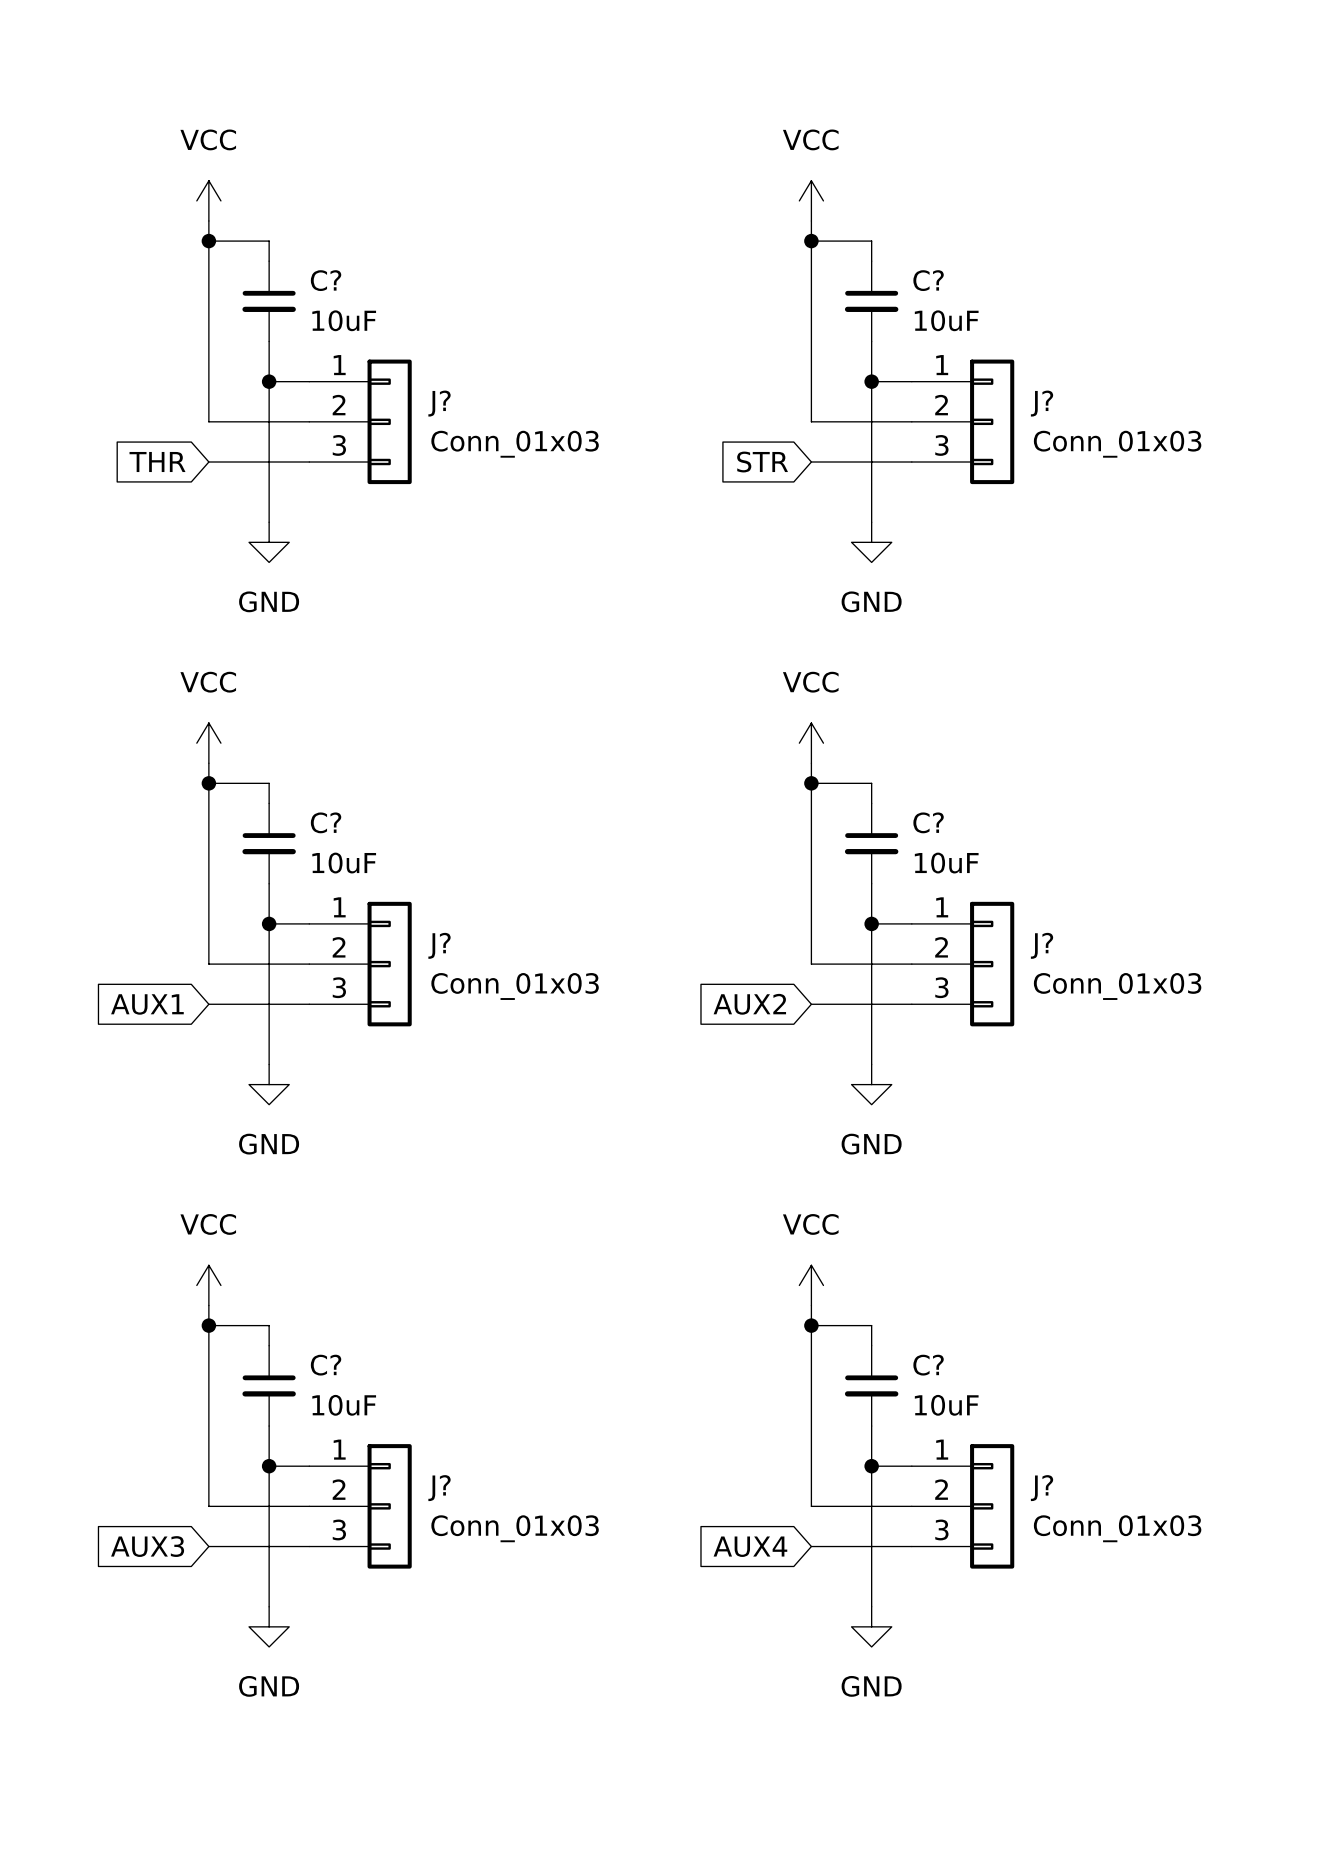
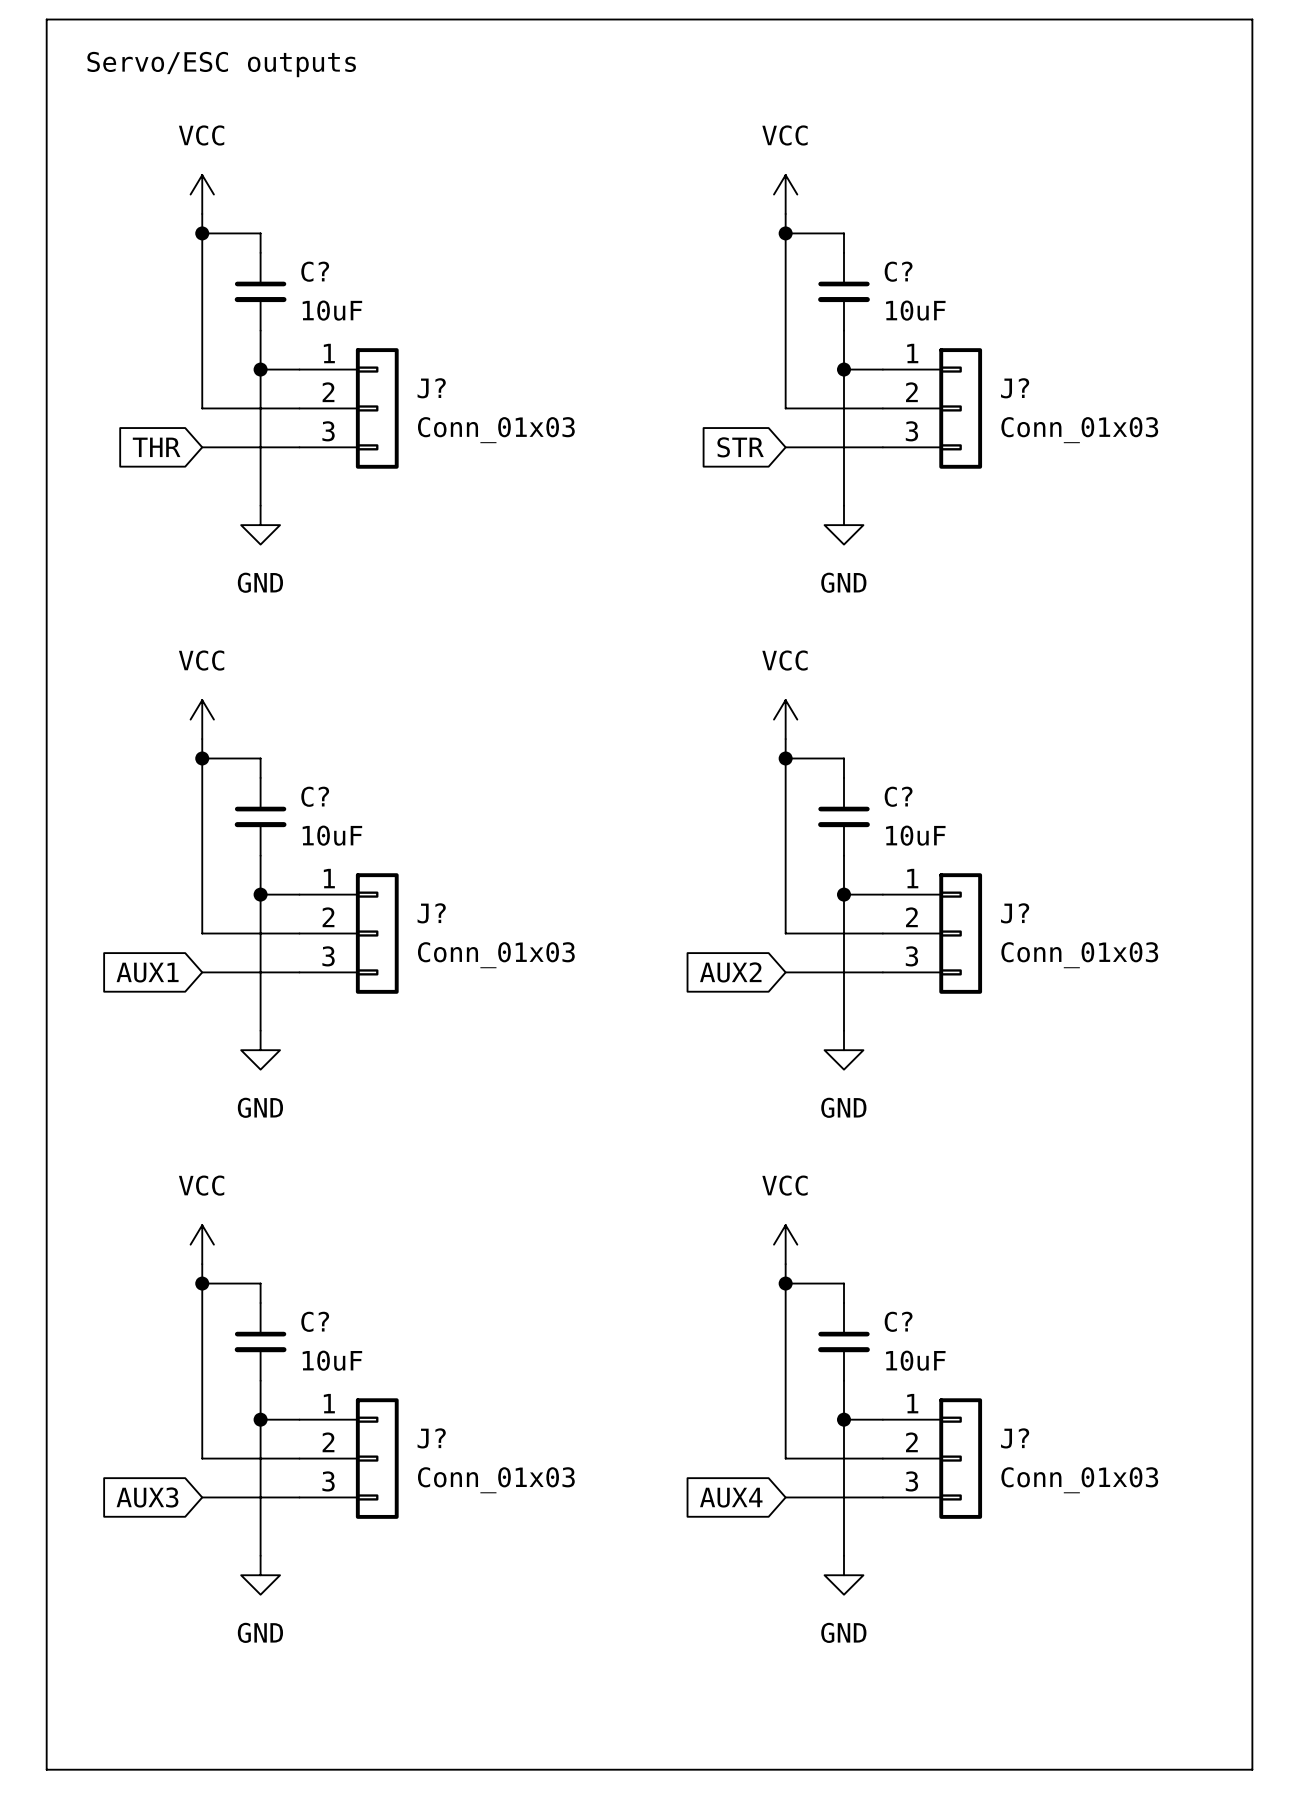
line: none -> (46, 19) (46, 1769) (1252, 1769) (1252, 19) (46, 19)
text: none -> Servo/ESC outputs (221, 64)

